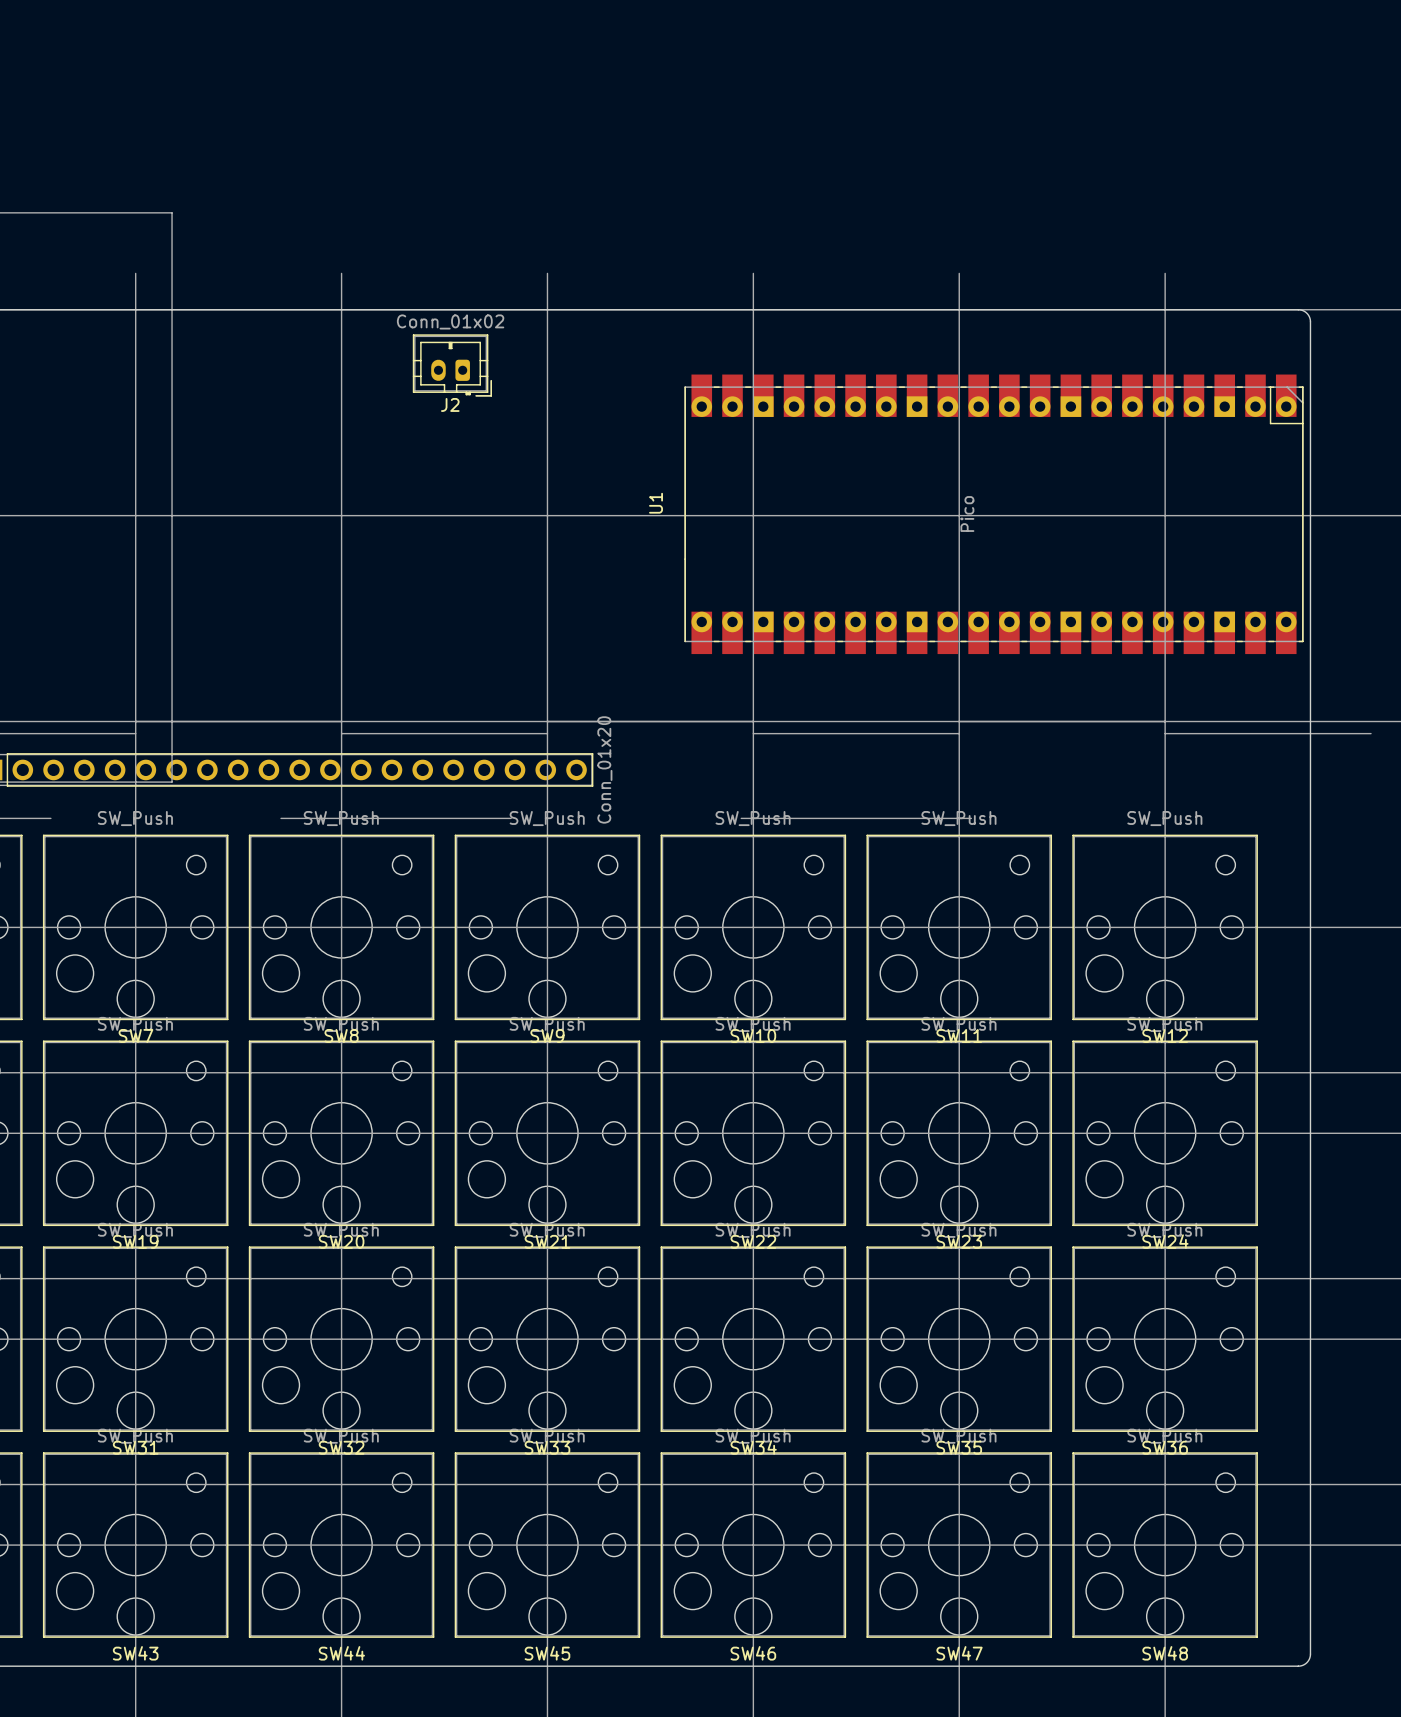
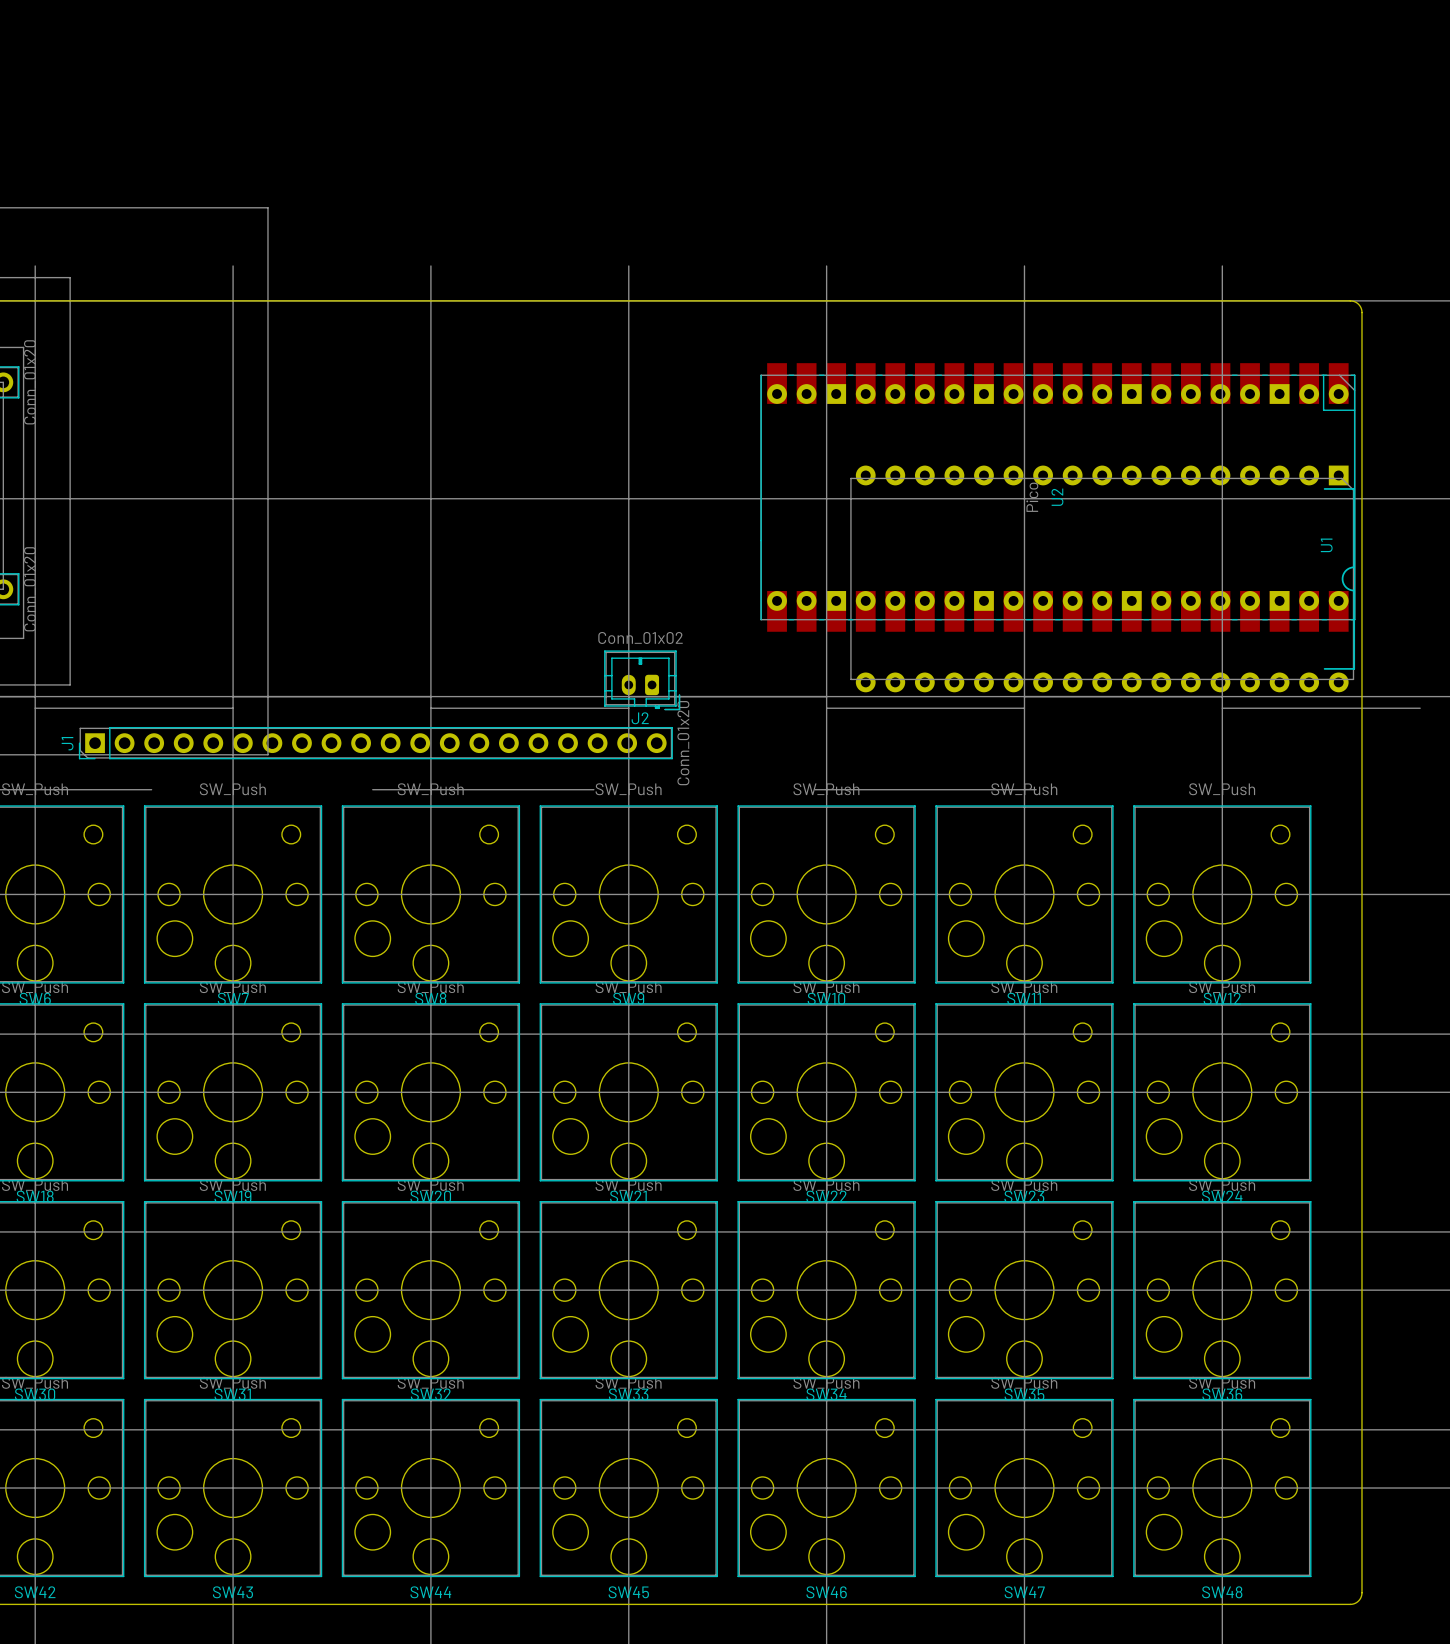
J2 position: (452, 365) -> (642, 680)
U1 name: U1 (656, 503) -> U2 (1057, 497)
U1: none -> (1102, 578)

